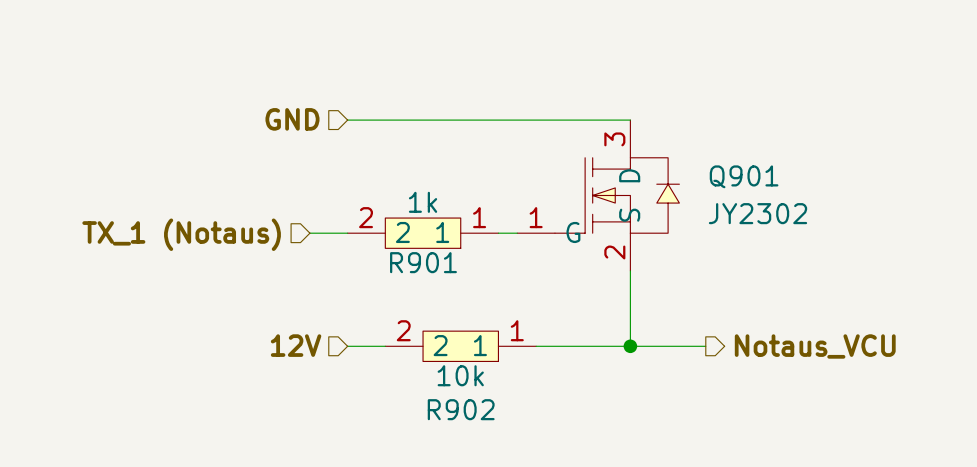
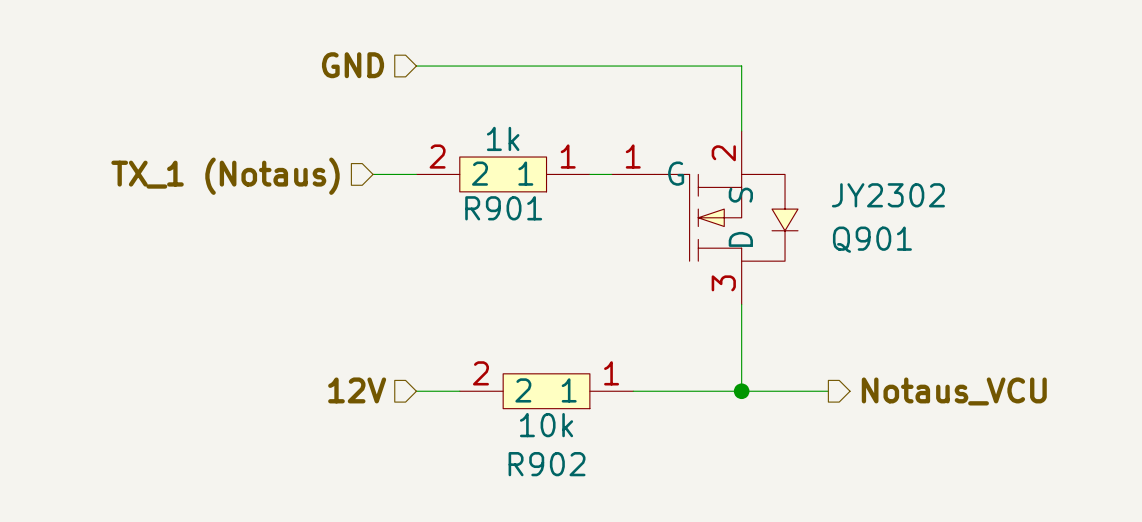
hierarchical label position: GND (292, 119) -> GND (353, 65)
wire: (347, 120) (630, 120) -> (416, 66) (741, 66) (741, 131)
Q901 flip: as is (617, 195) -> up-down (726, 217)
wire: (309, 233) (347, 233) -> (373, 174) (416, 174)
R901 position: (423, 233) -> (503, 174)
wire: (498, 233) (517, 233) -> (589, 174) (611, 174)
hierarchical label position: TX_1 (Notaus) (181, 234) -> TX_1 (Notaus) (225, 176)

